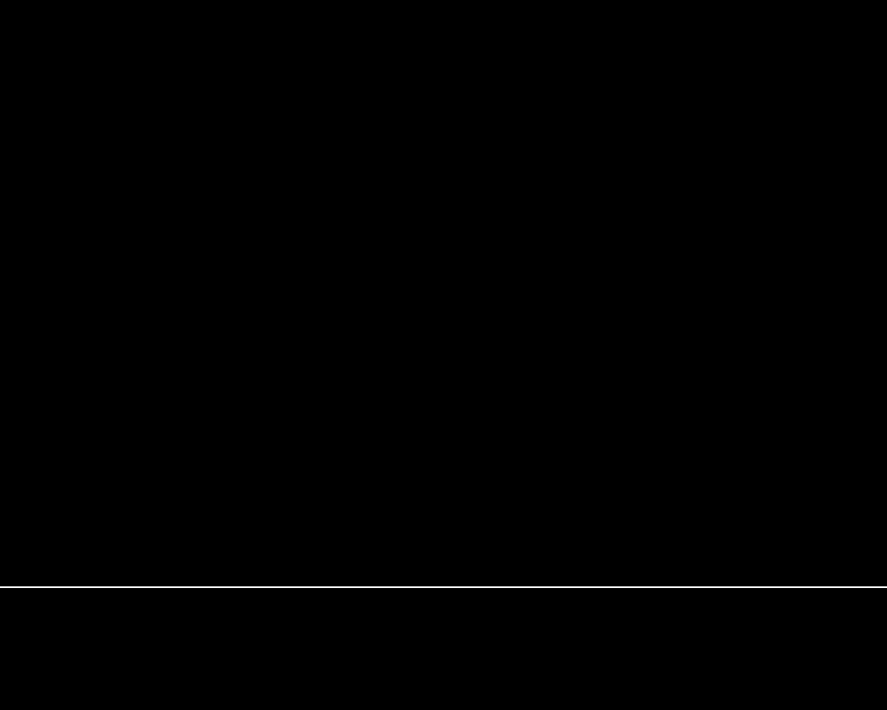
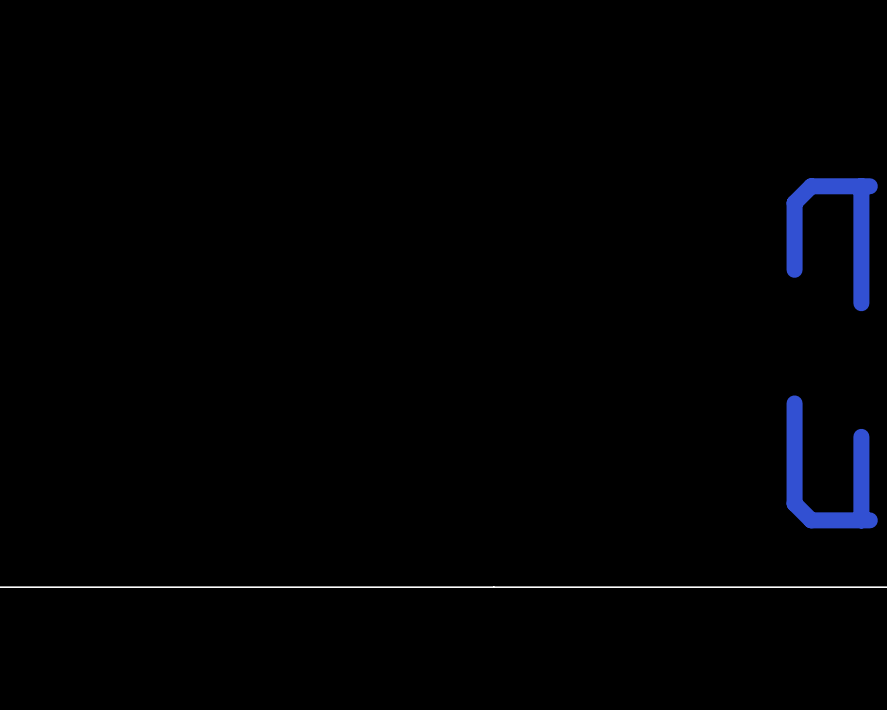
bottom track: none -> (861, 186) (861, 303)
bottom track: none -> (869, 186) (811, 186) (794, 202) (794, 269)
bottom track: none -> (794, 403) (794, 503) (811, 520) (869, 520)
bottom track: none -> (861, 436) (861, 520)

